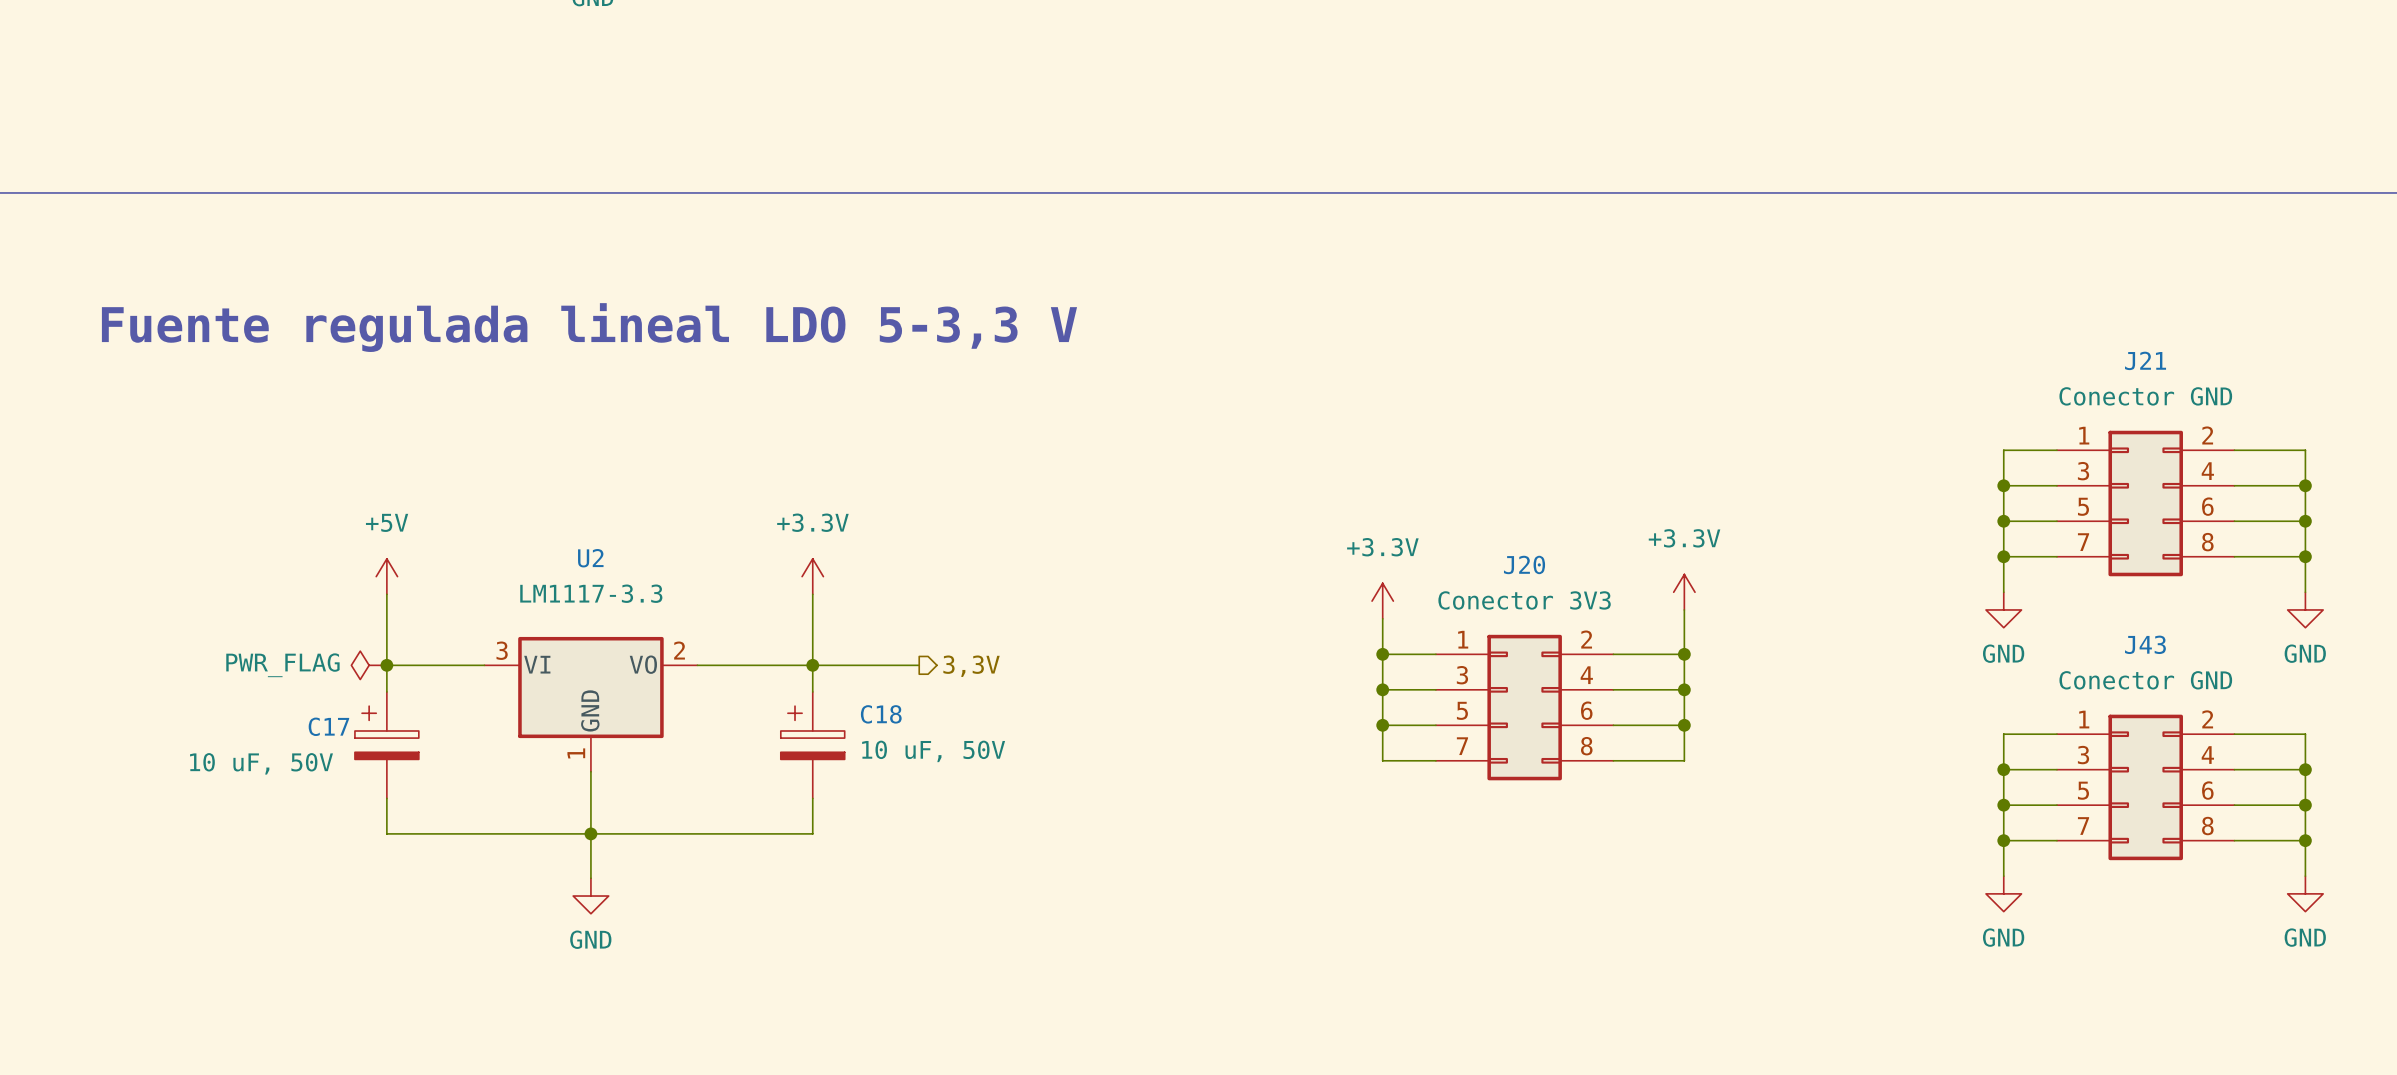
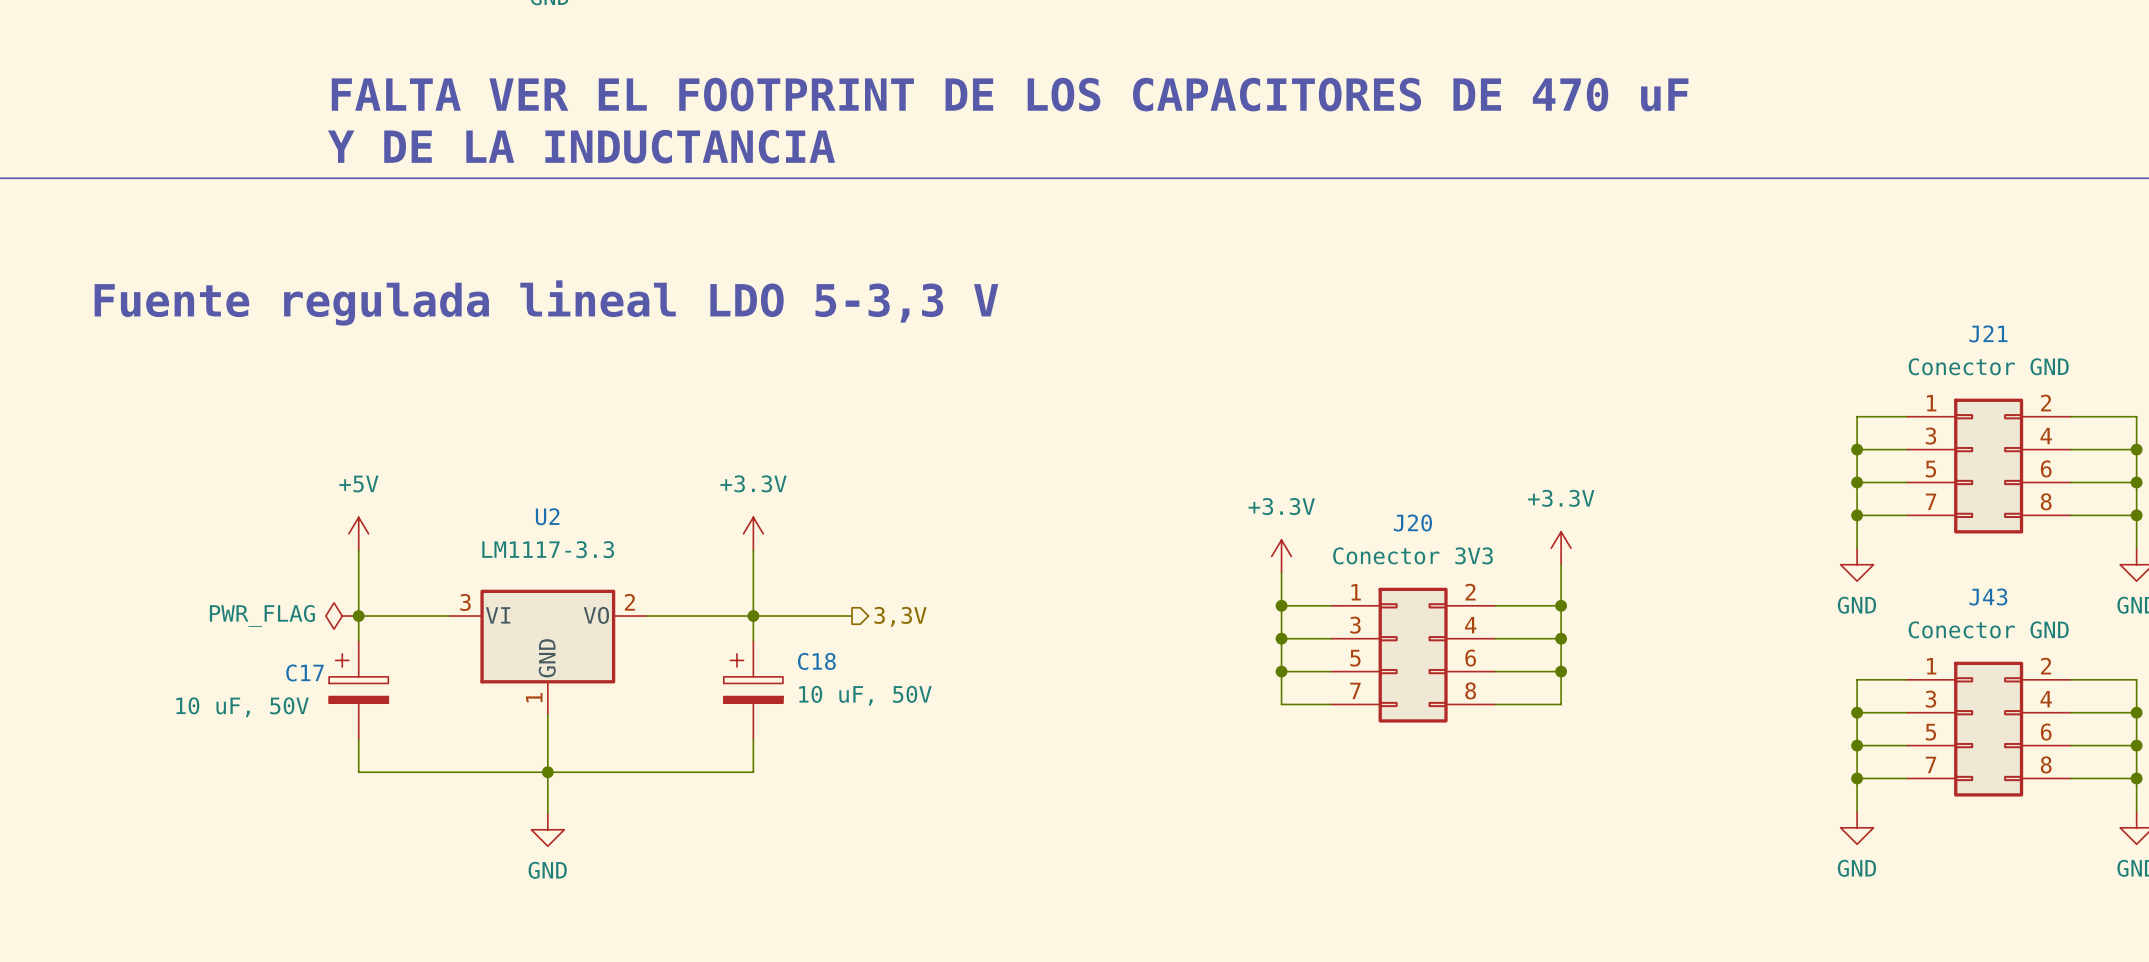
text: none -> FALTA VER EL FOOTPRINT DE LOS CAPACITORES DE 470 uF (1010, 94)
text: none -> Y DE LA INDUCTANCIA (581, 146)

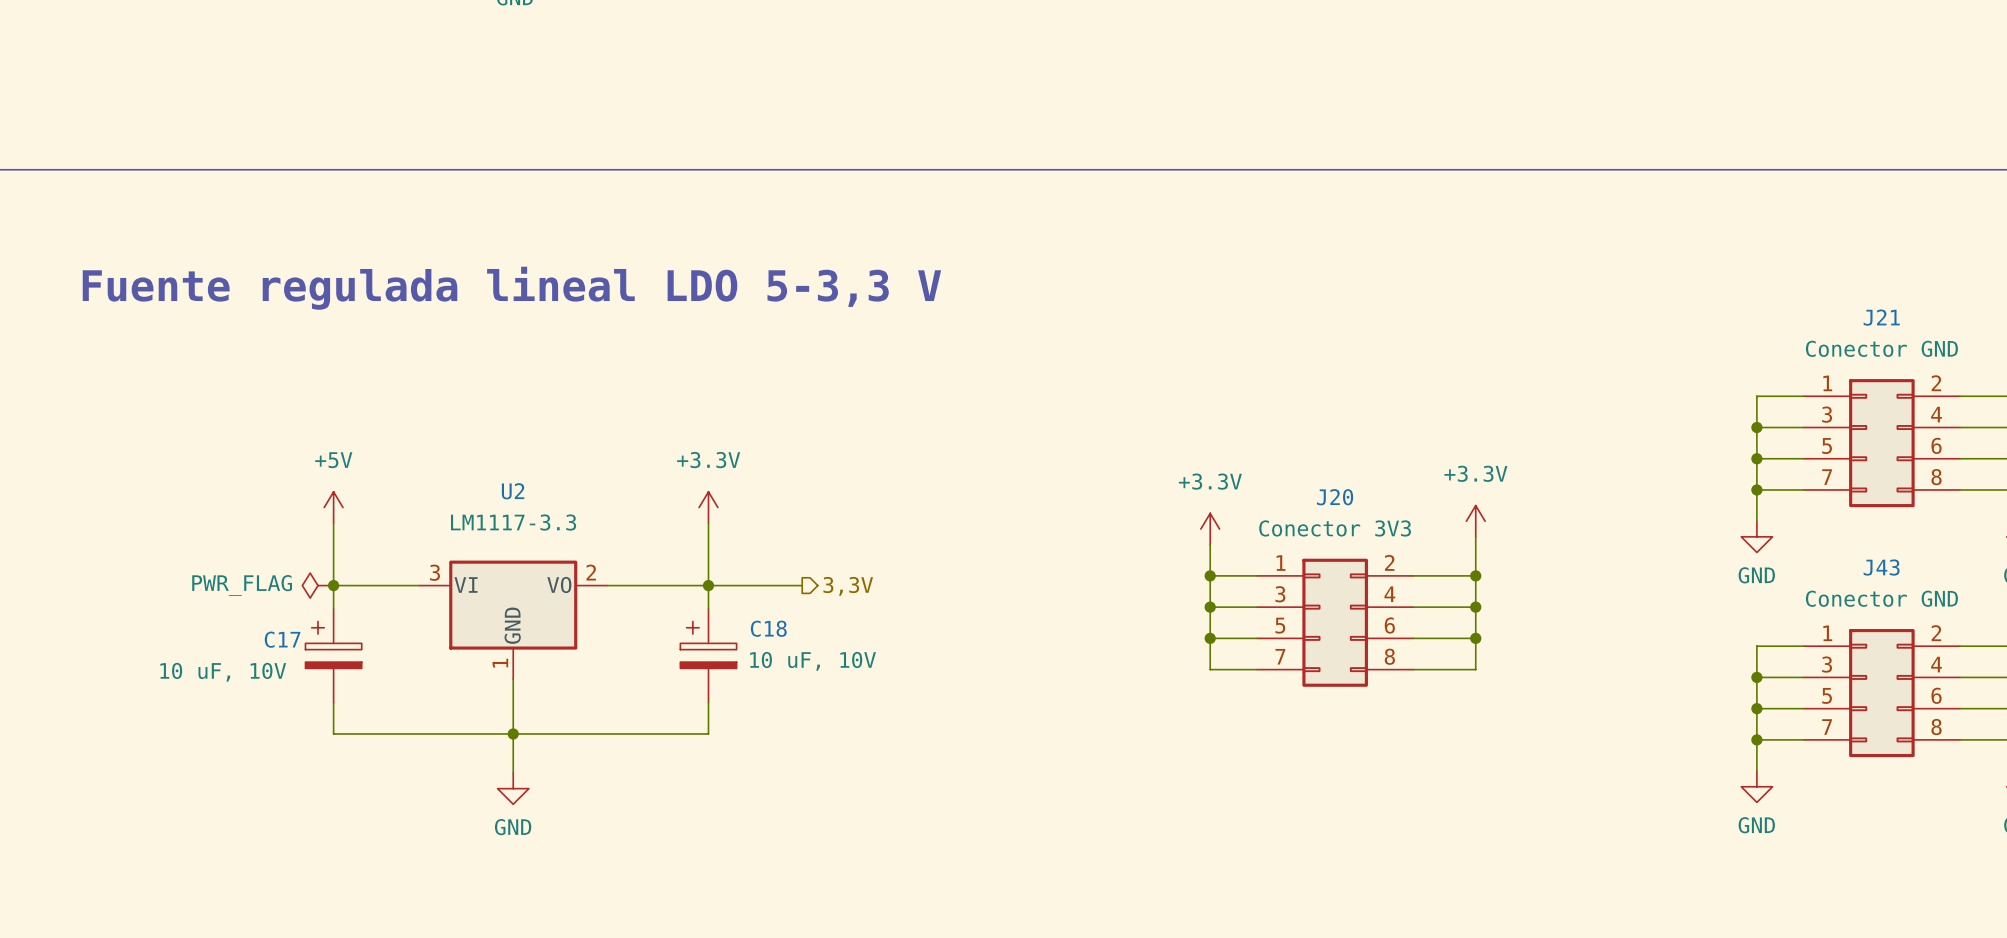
text: FALTA VER EL FOOTPRINT DE LOS CAPACITORES DE 470 uF (1010, 94) -> none
text: Y DE LA INDUCTANCIA (581, 146) -> none
C18 value: 10 uF, 50V (865, 695) -> 10 uF, 10V (813, 661)
C17 value: 10 uF, 50V (242, 707) -> 10 uF, 10V (223, 672)

